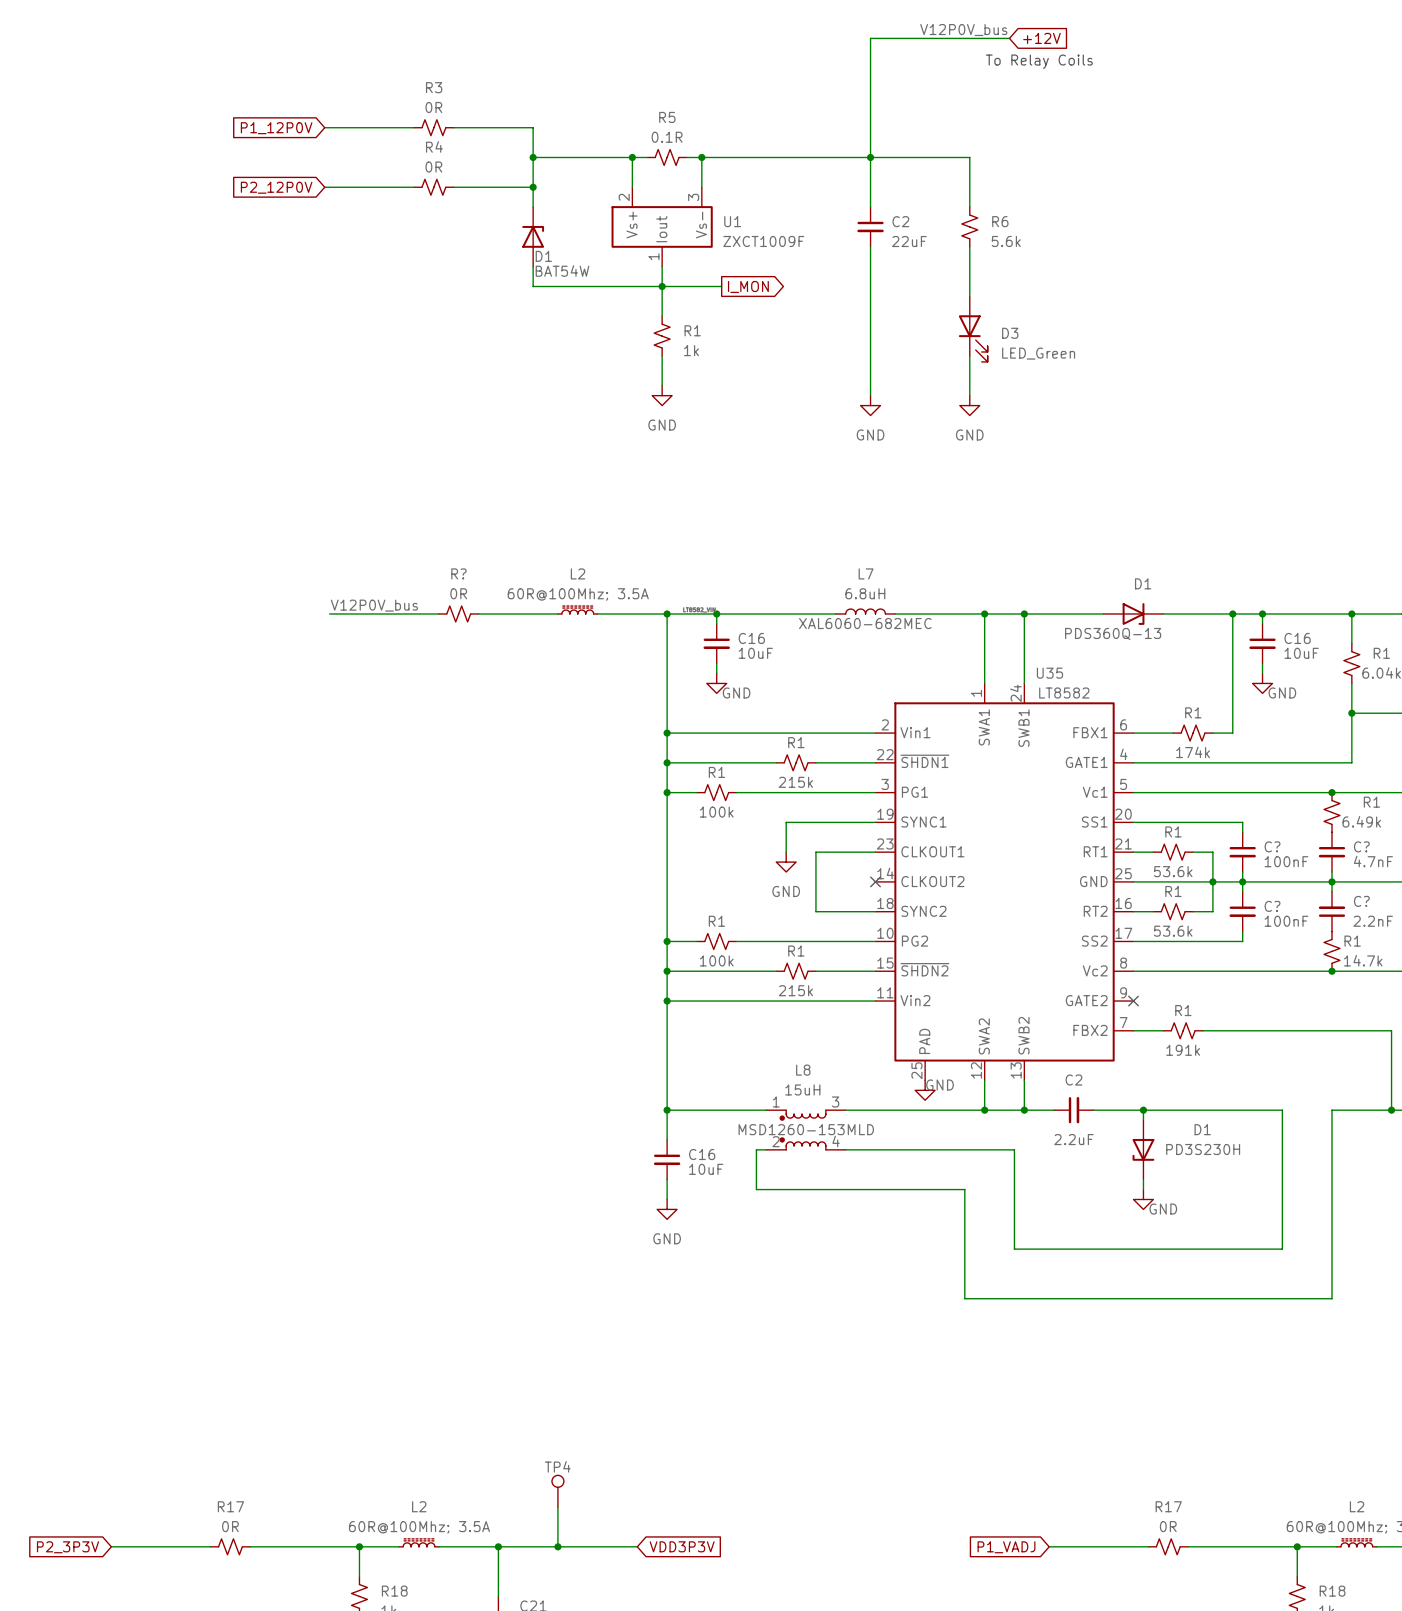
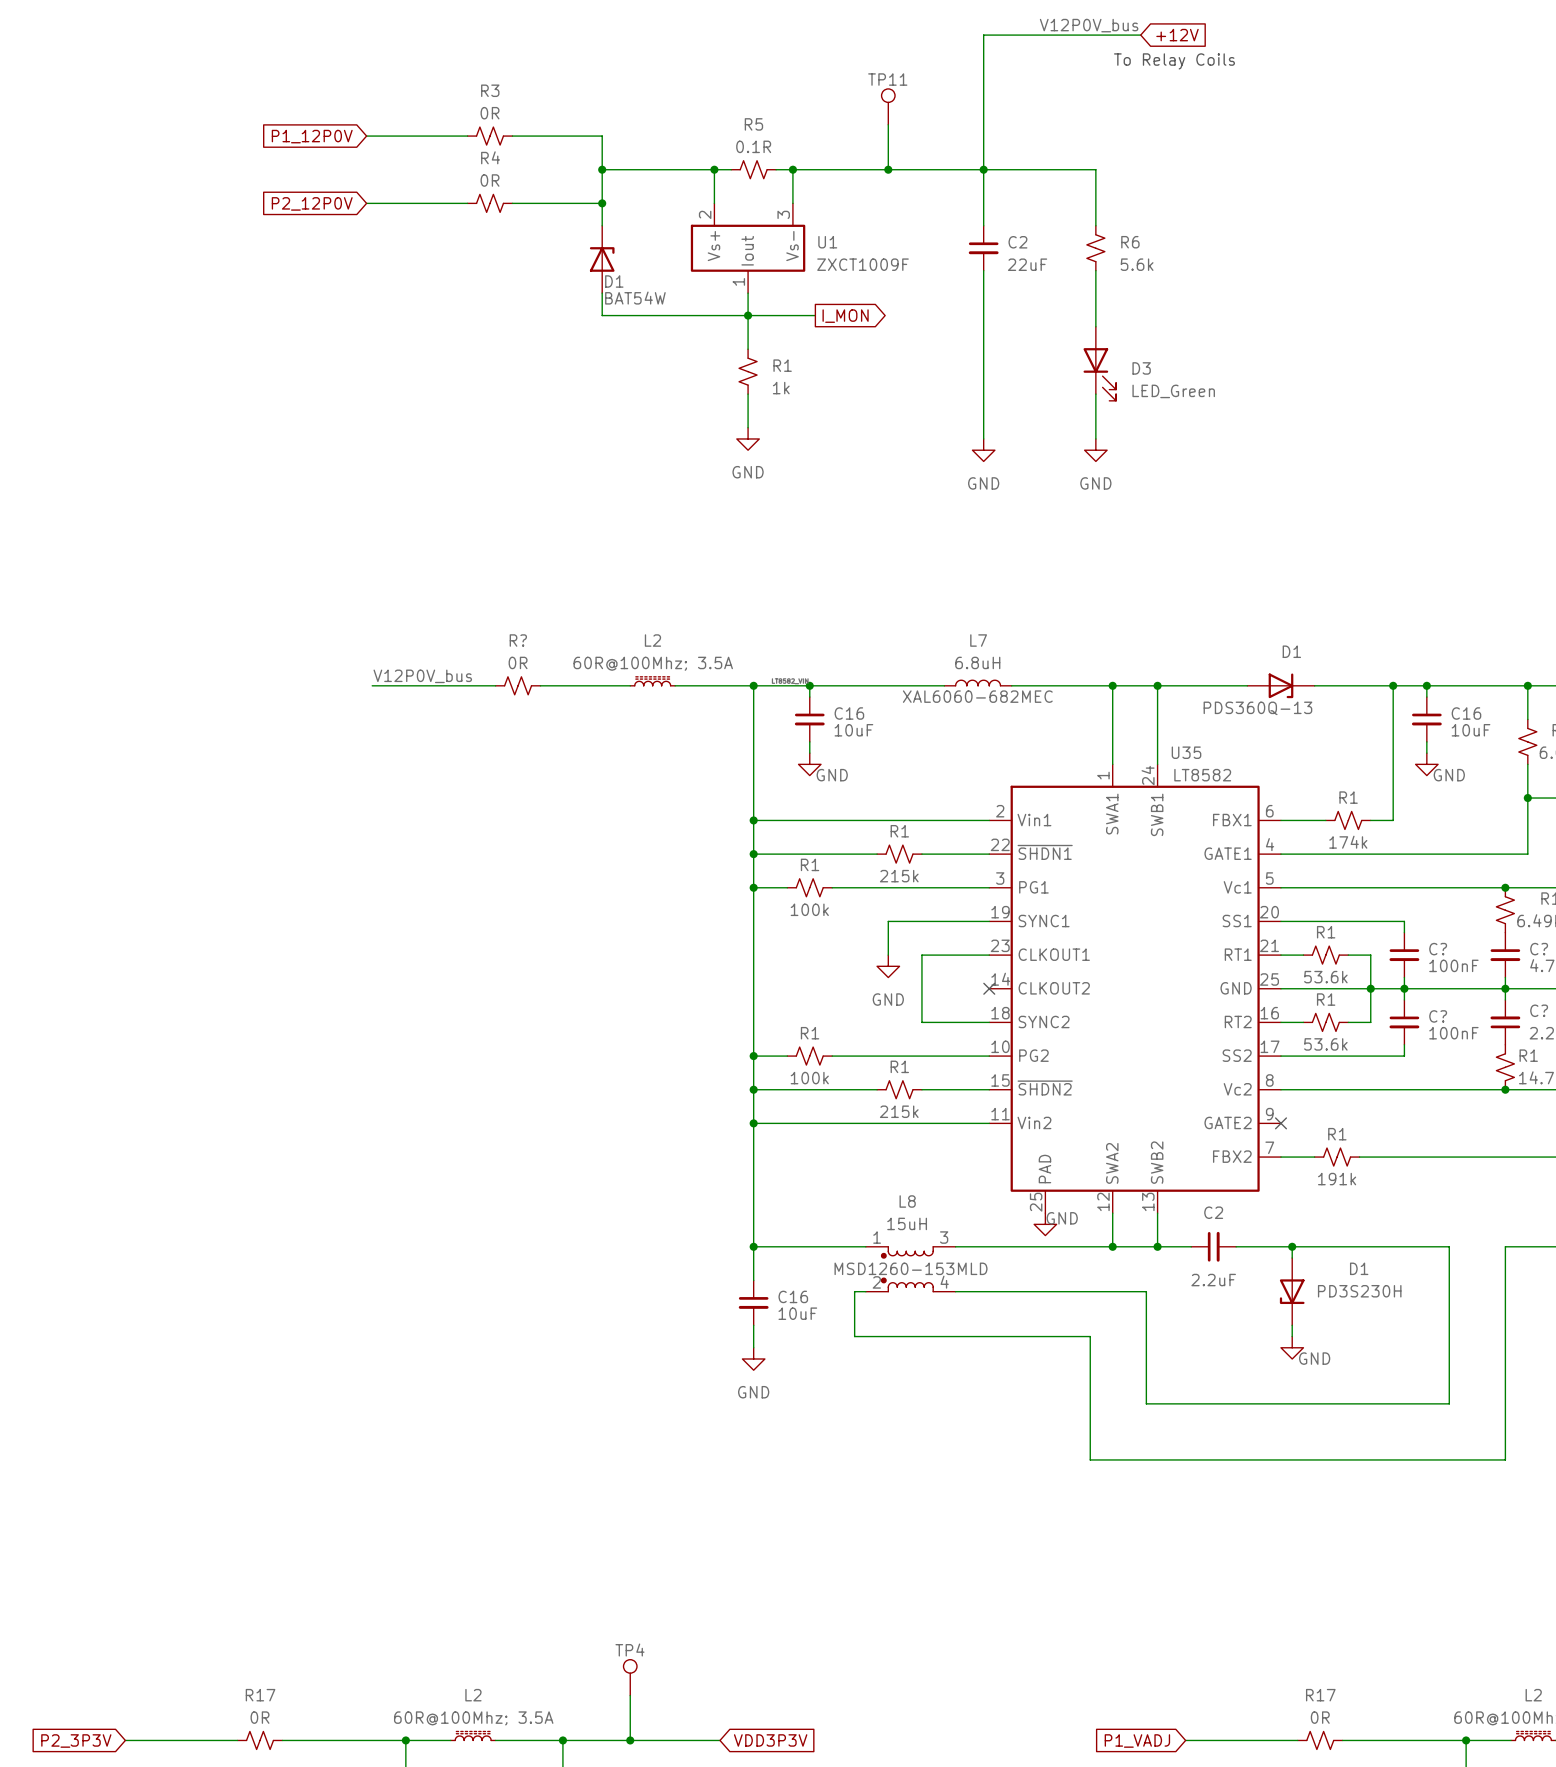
TP11: none -> (888, 106)
wire: none -> (888, 124) (888, 169)
junction: none -> (888, 169)

